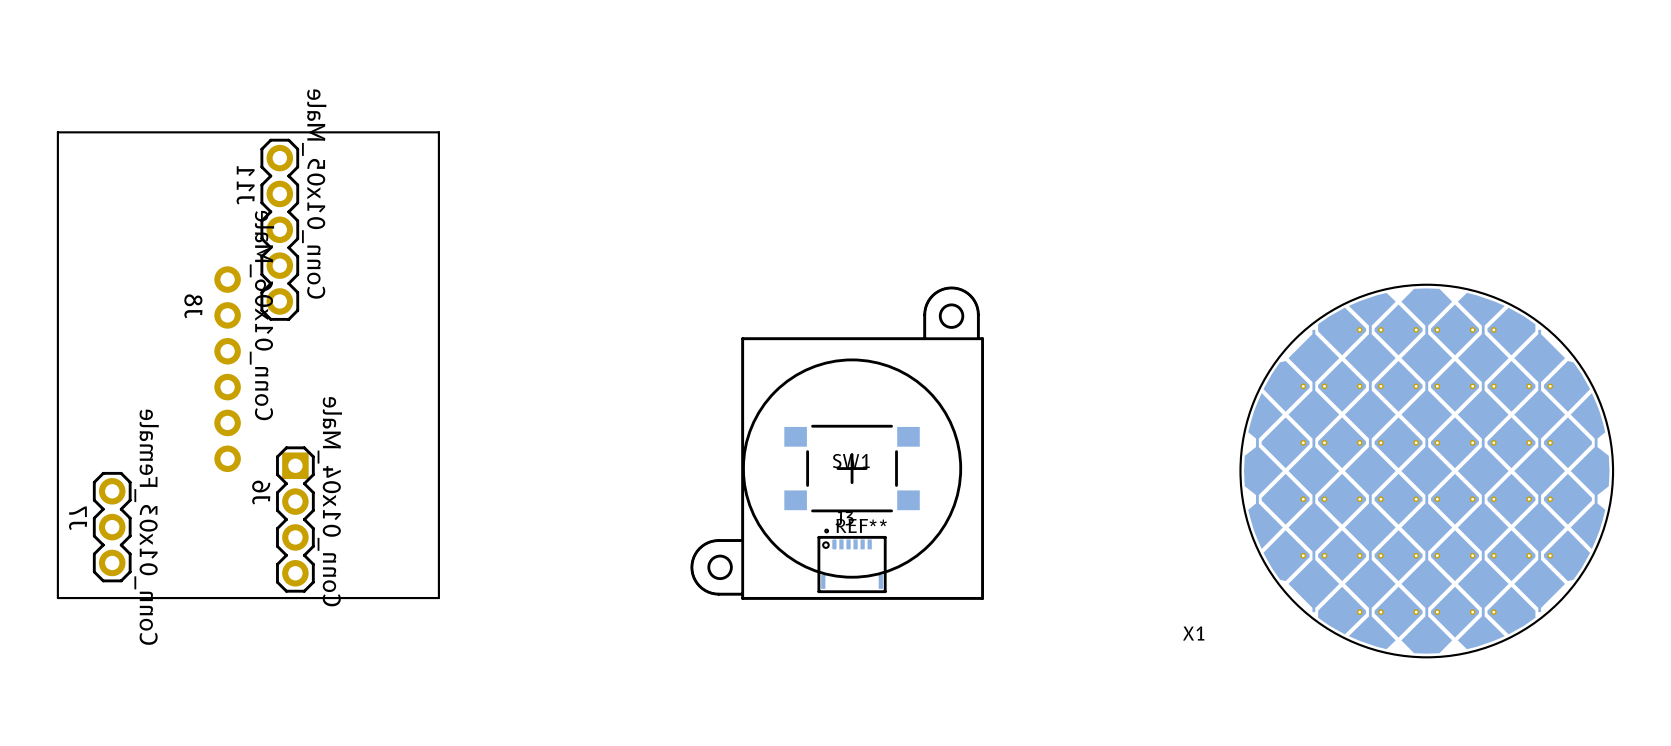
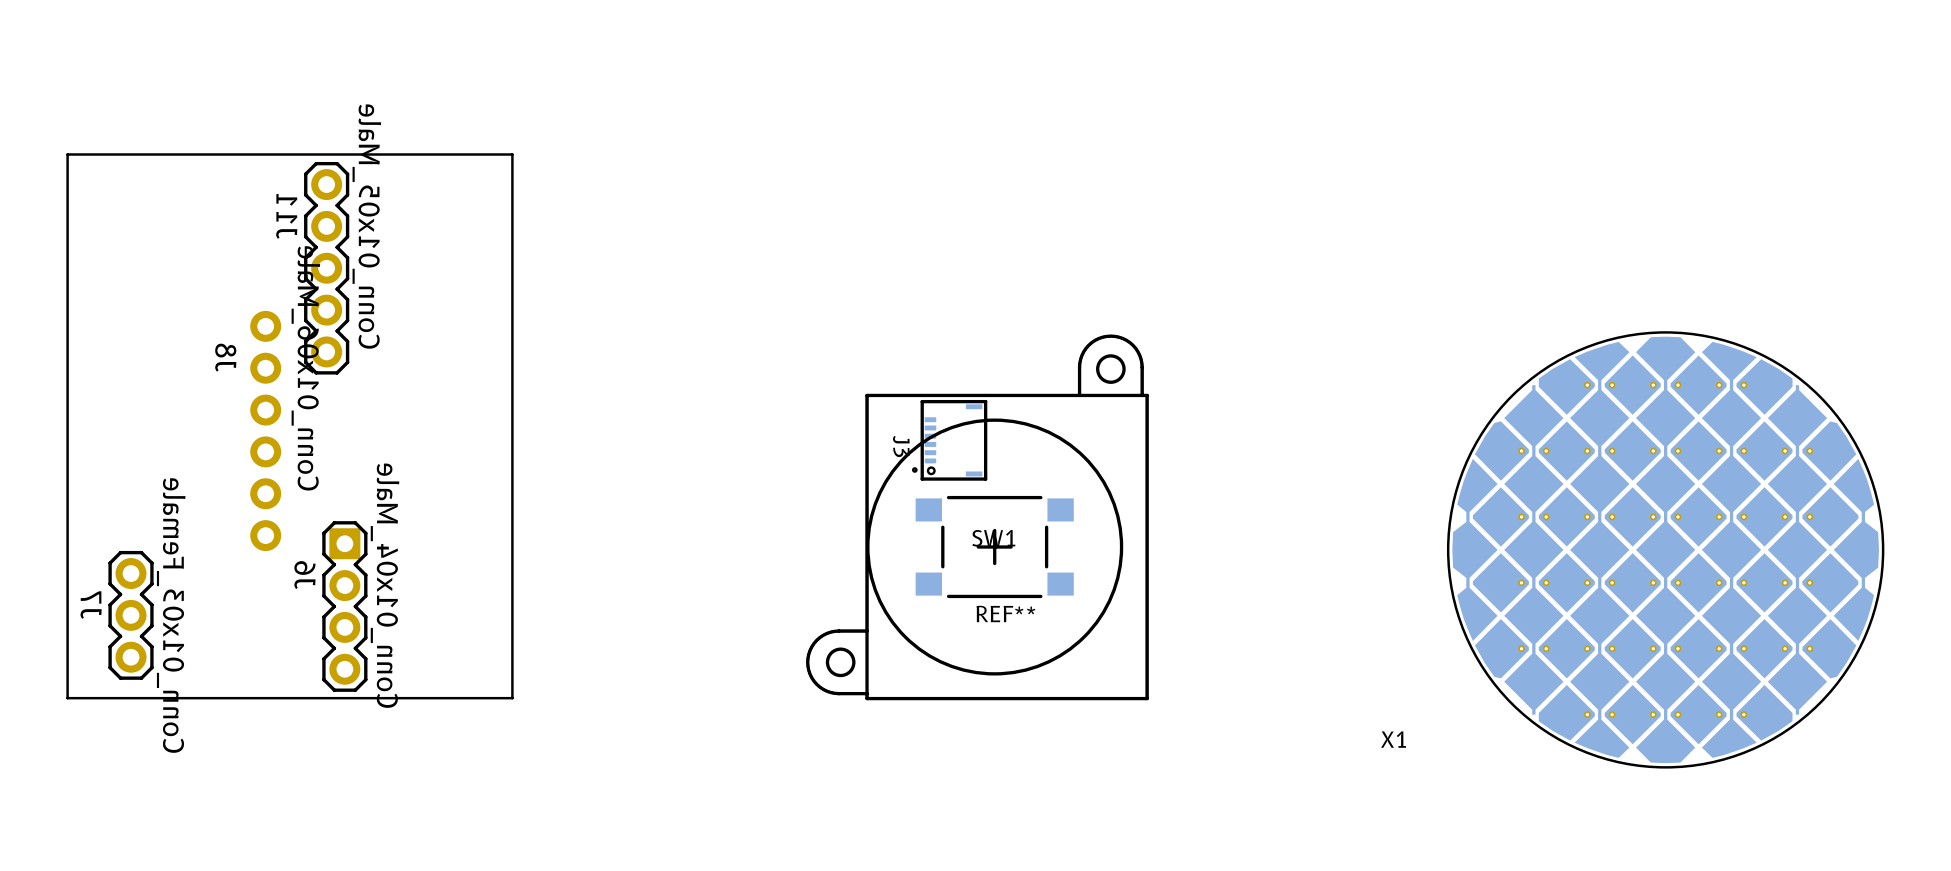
J3 rotation: 0° (852, 560) -> 90° counterclockwise (949, 440)
J3 position: (852, 560) -> (949, 440)

